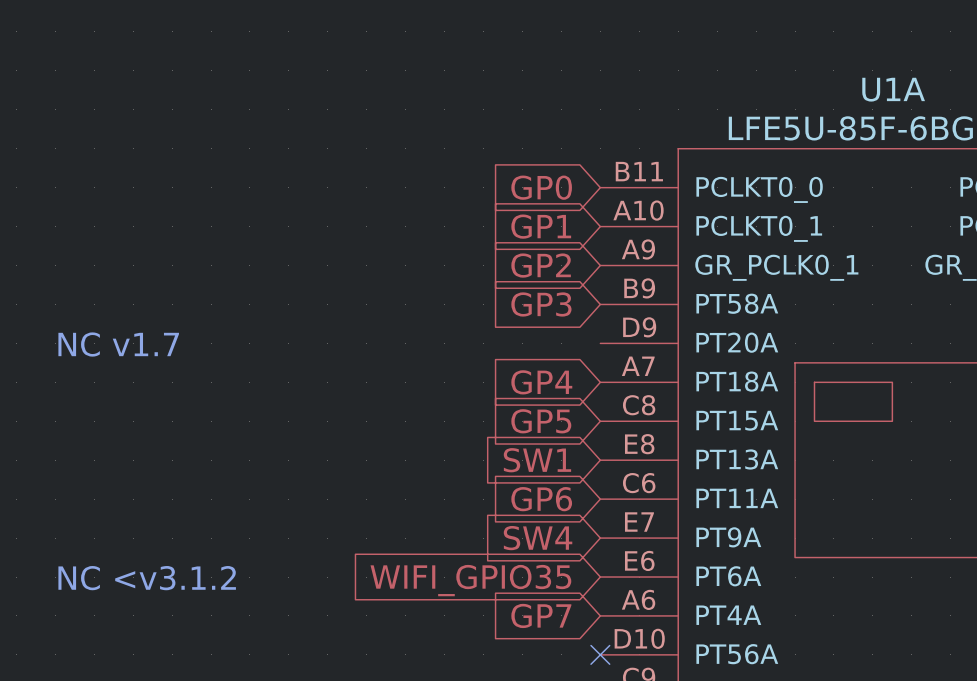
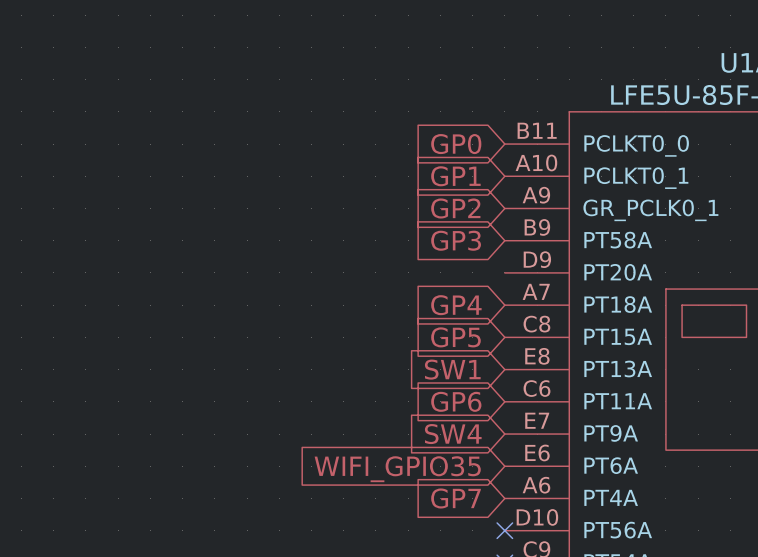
text: NC v1.7 (118, 344) -> none
text: NC <v3.1.2 (147, 578) -> none

